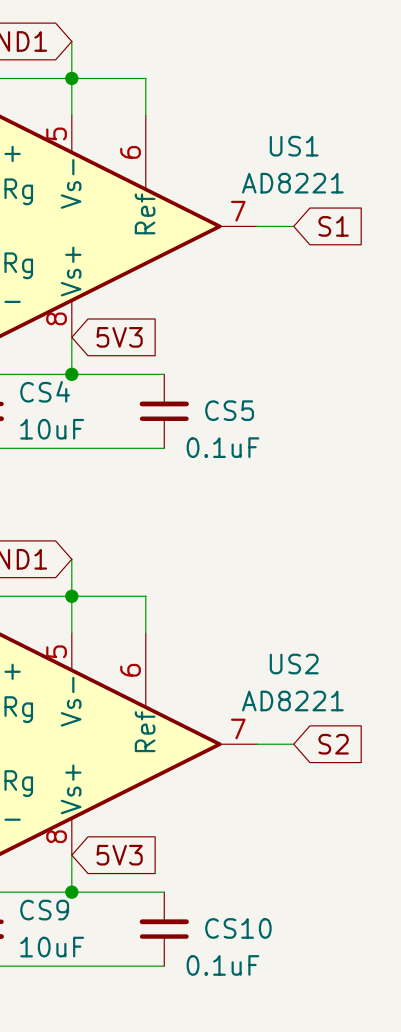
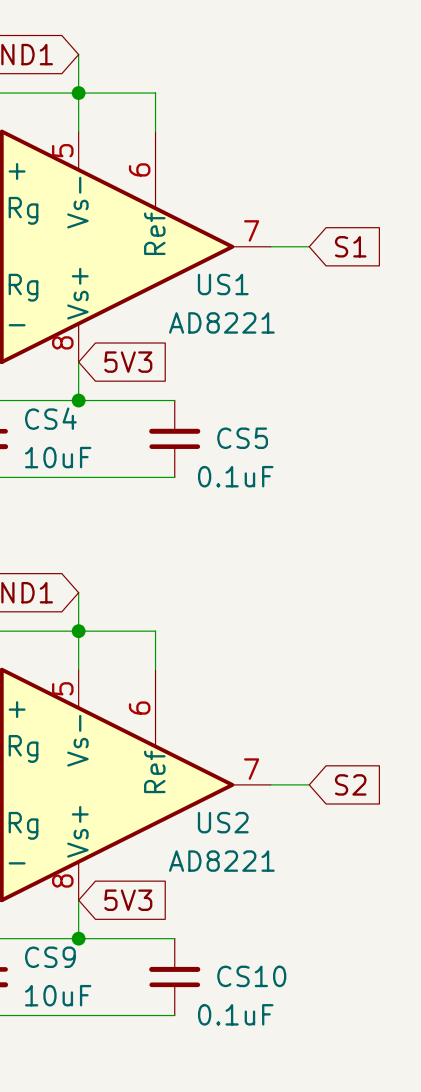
US1 name position: US1 (294, 146) -> US1 (223, 284)
US1 value position: AD8221 (292, 183) -> AD8221 (221, 322)
US2 name position: US2 (294, 664) -> US2 (223, 822)
US2 value position: AD8221 (292, 700) -> AD8221 (221, 861)

